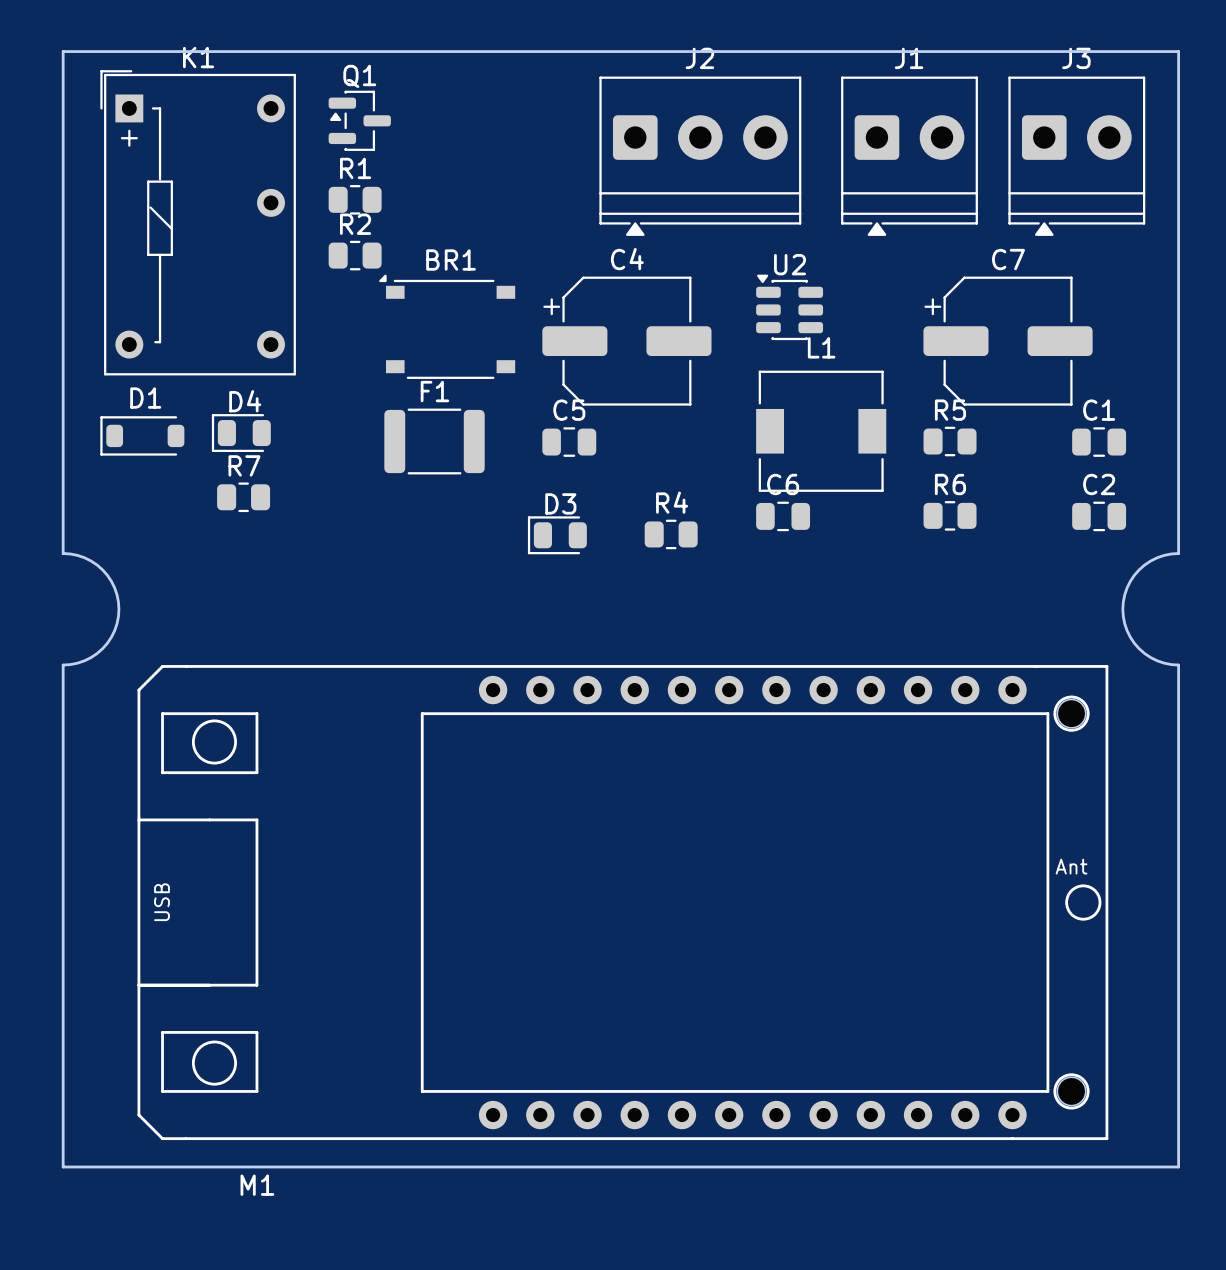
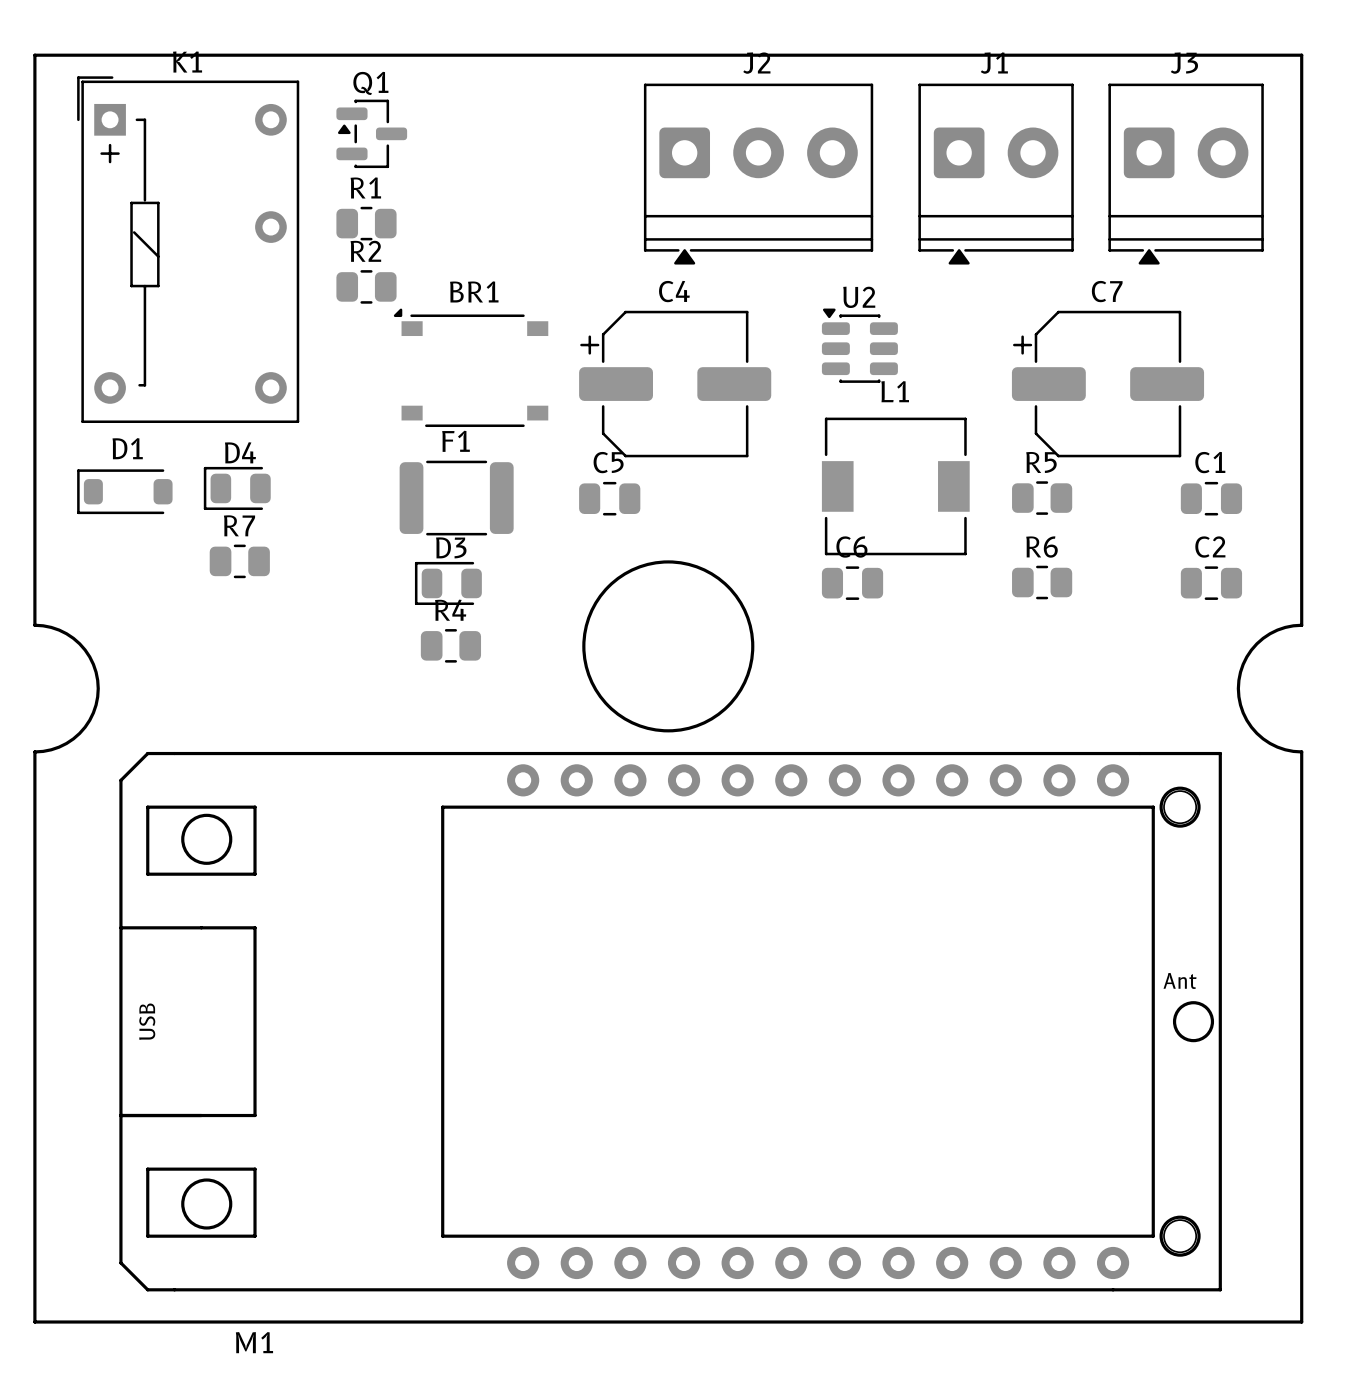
round board edge: none -> [582, 560, 755, 733]
R4 position: (671, 534) -> (450, 645)
D3 position: (557, 535) -> (448, 583)

